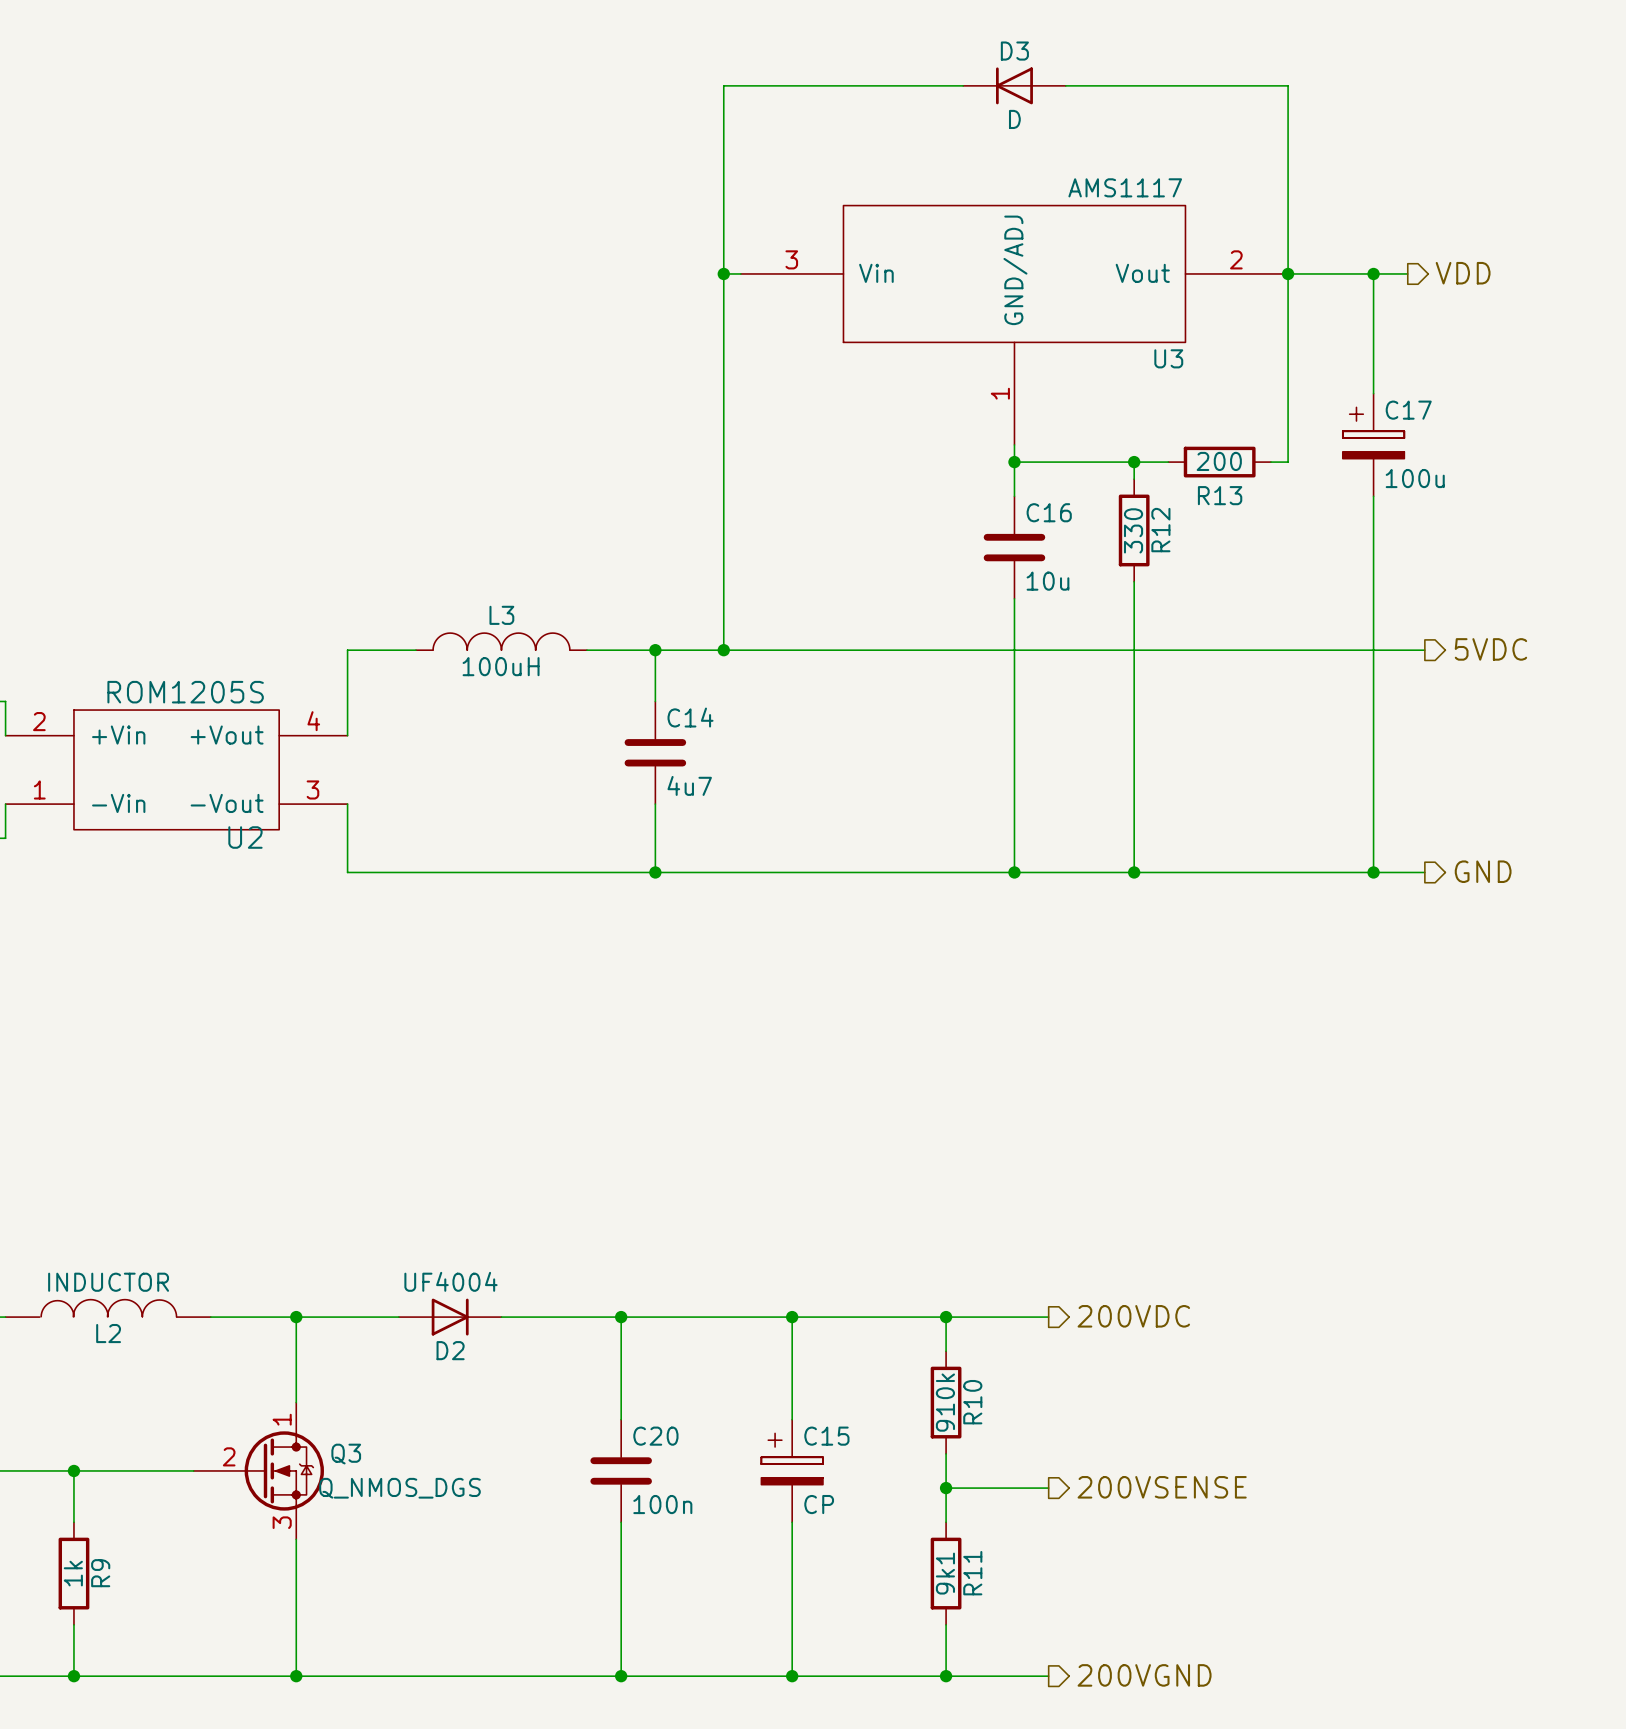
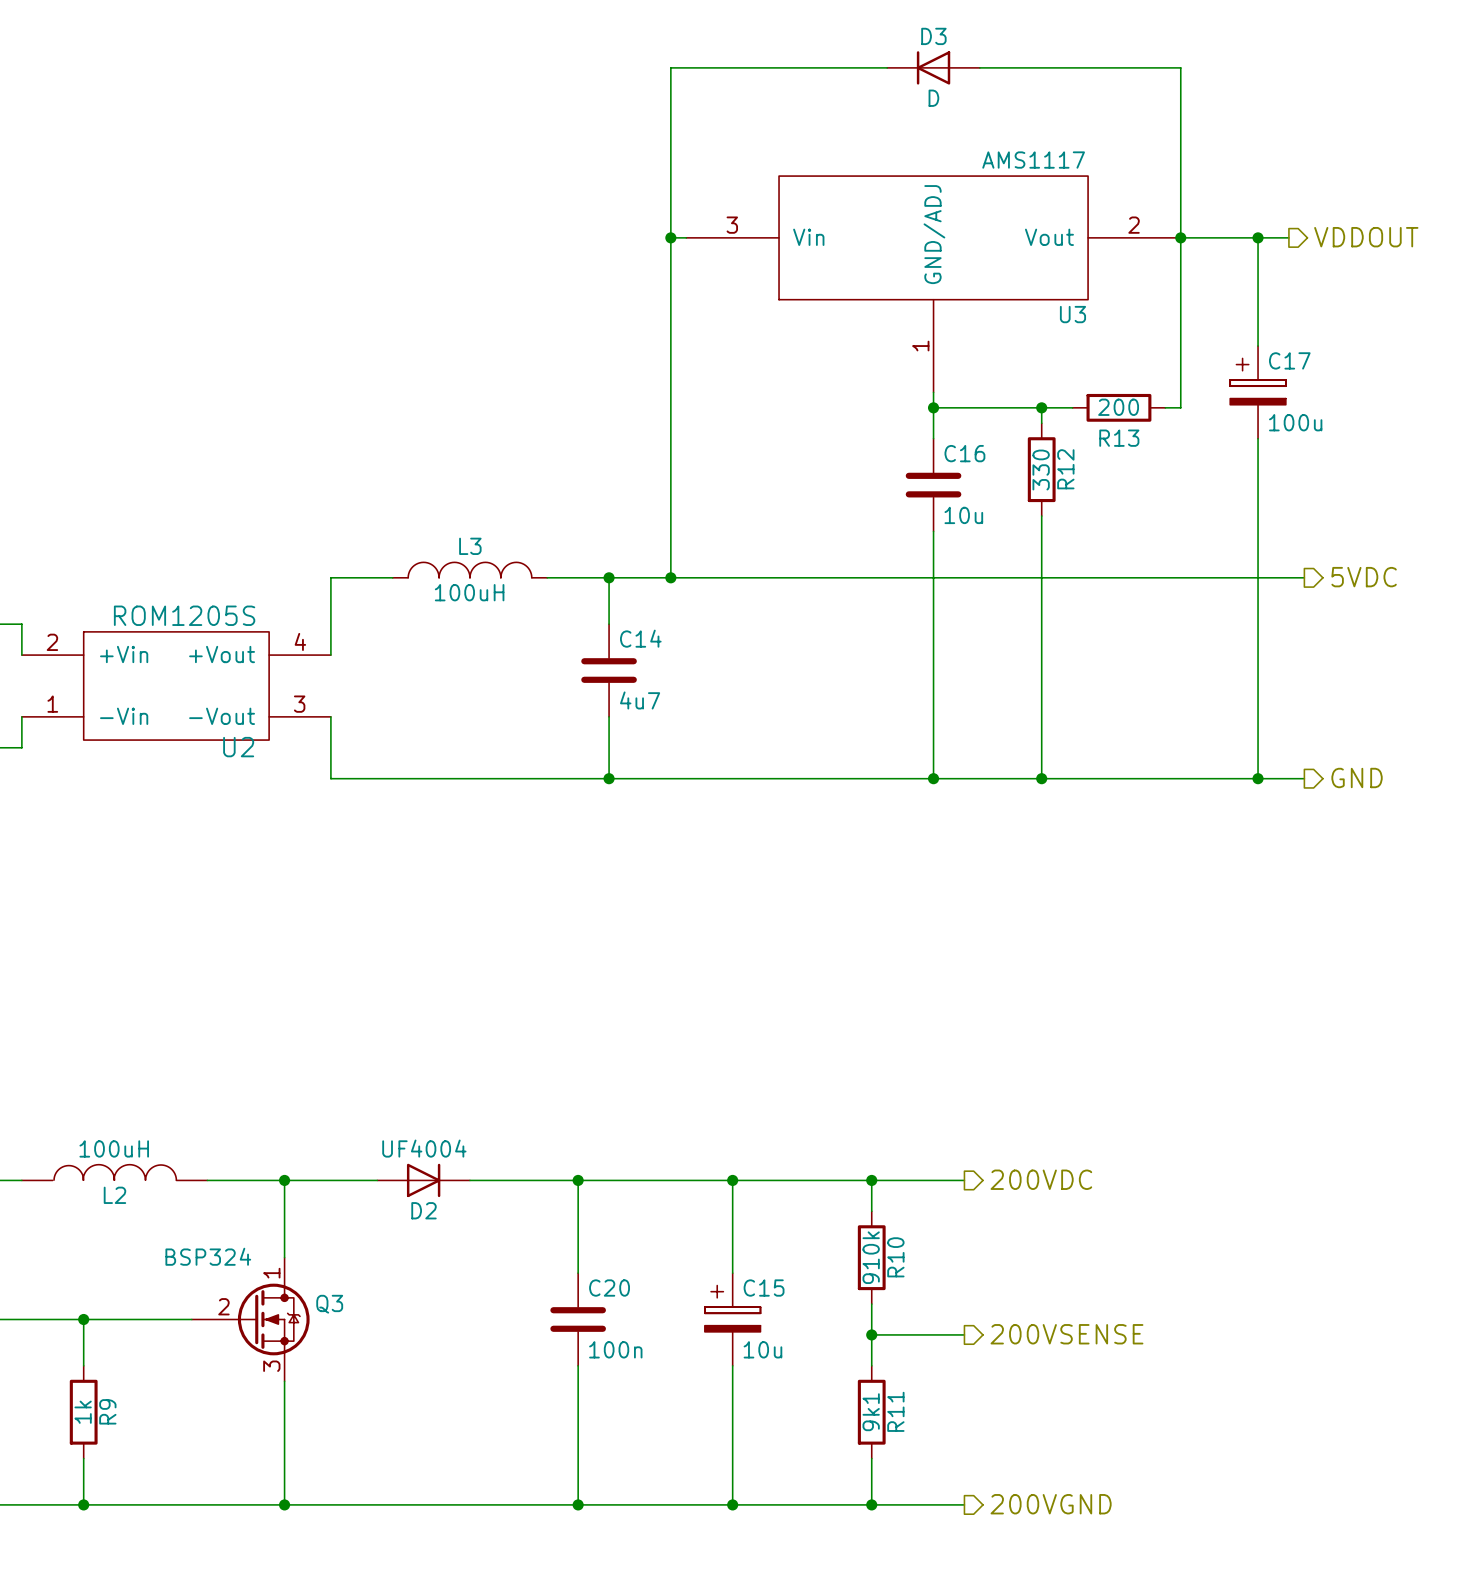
hierarchical label: VDD (1463, 273) -> VDDOUT (1366, 237)
L2 value: INDUCTOR (108, 1282) -> 100uH (114, 1148)
Q3 value: Q_NMOS_DGS (399, 1488) -> BSP324 (208, 1256)
C15 value: CP (819, 1504) -> 10u (762, 1349)

